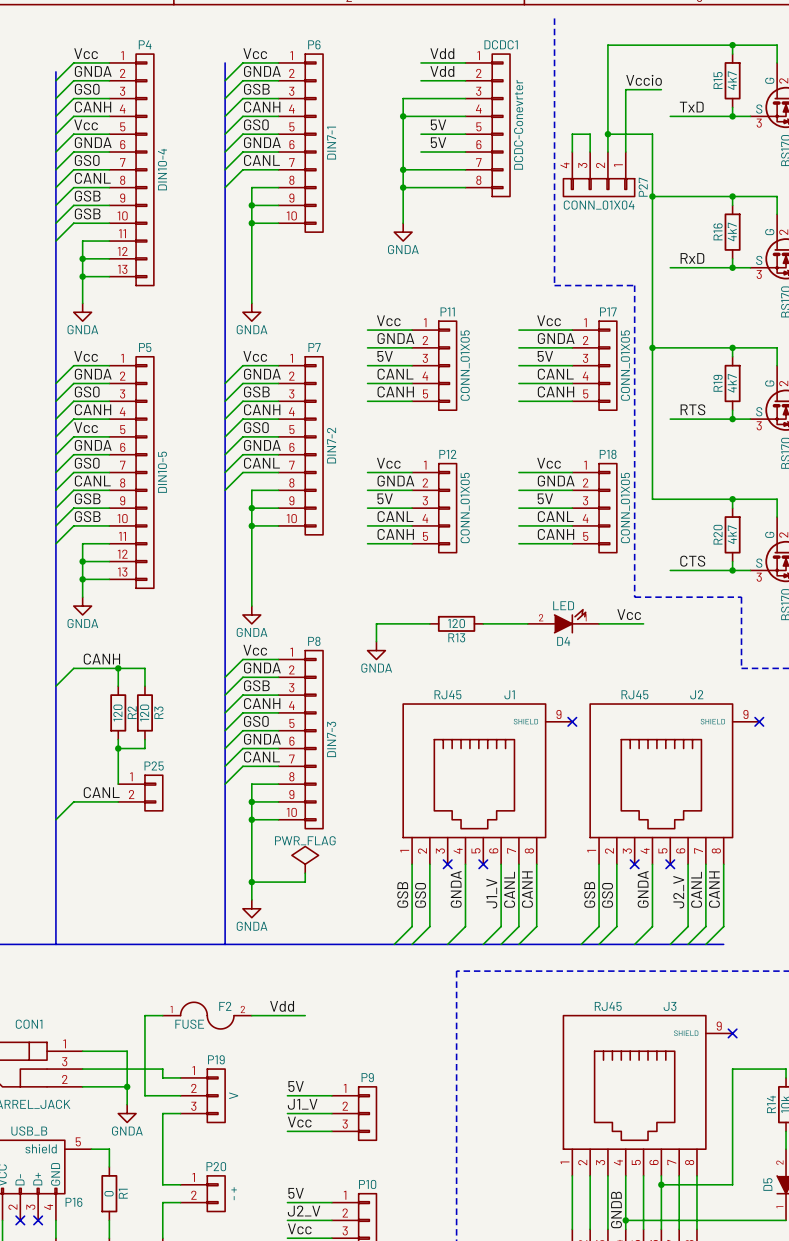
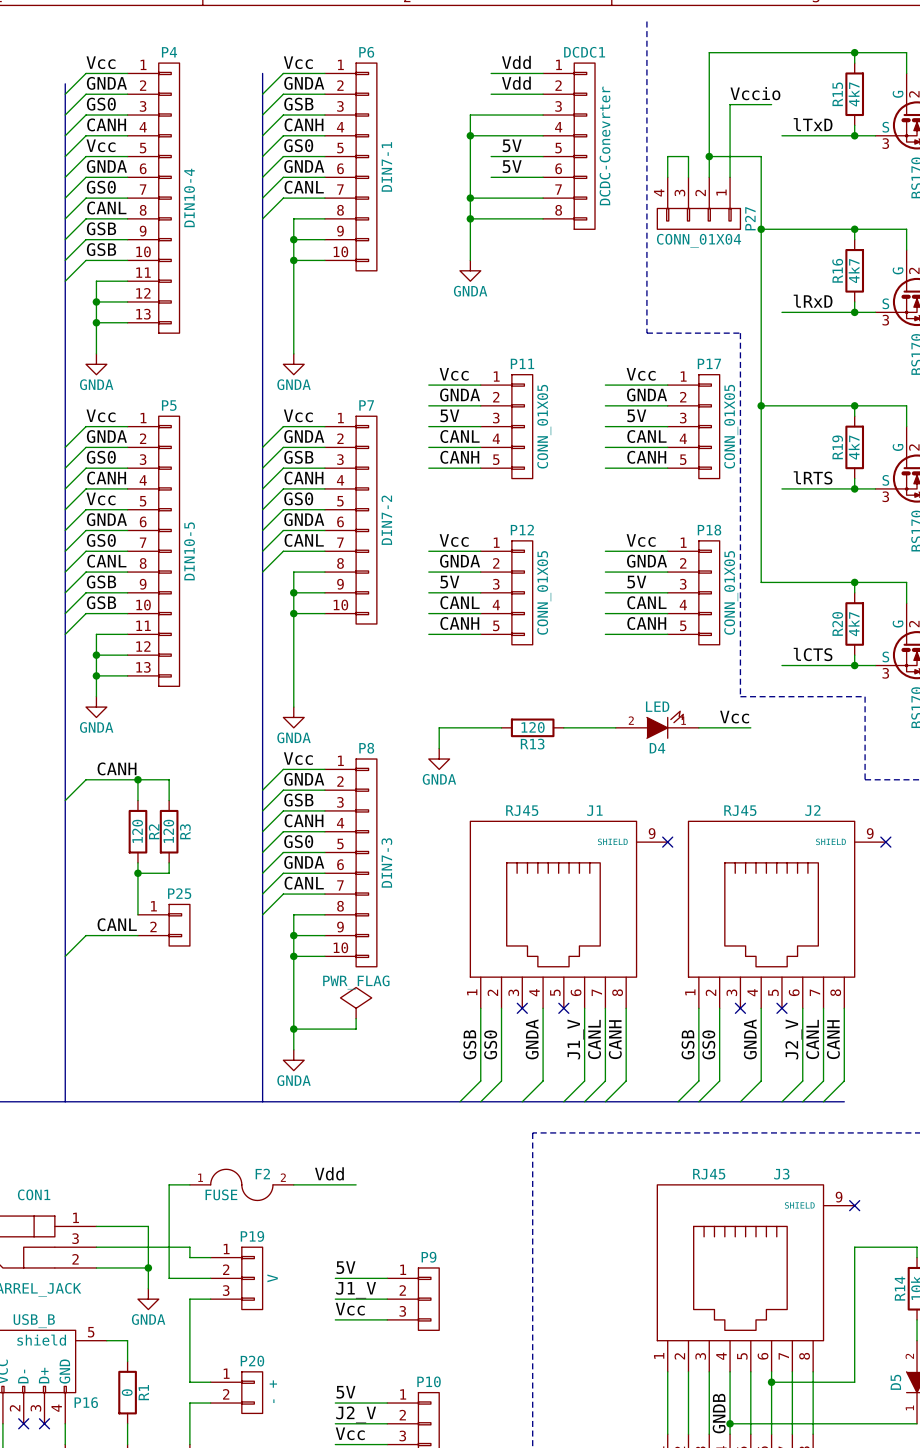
label: TxD (691, 107) -> lTxD (813, 124)
label: RxD (692, 258) -> lRxD (813, 301)
label: RTS (692, 409) -> lRTS (813, 477)
label: CTS (692, 561) -> lCTS (813, 654)

